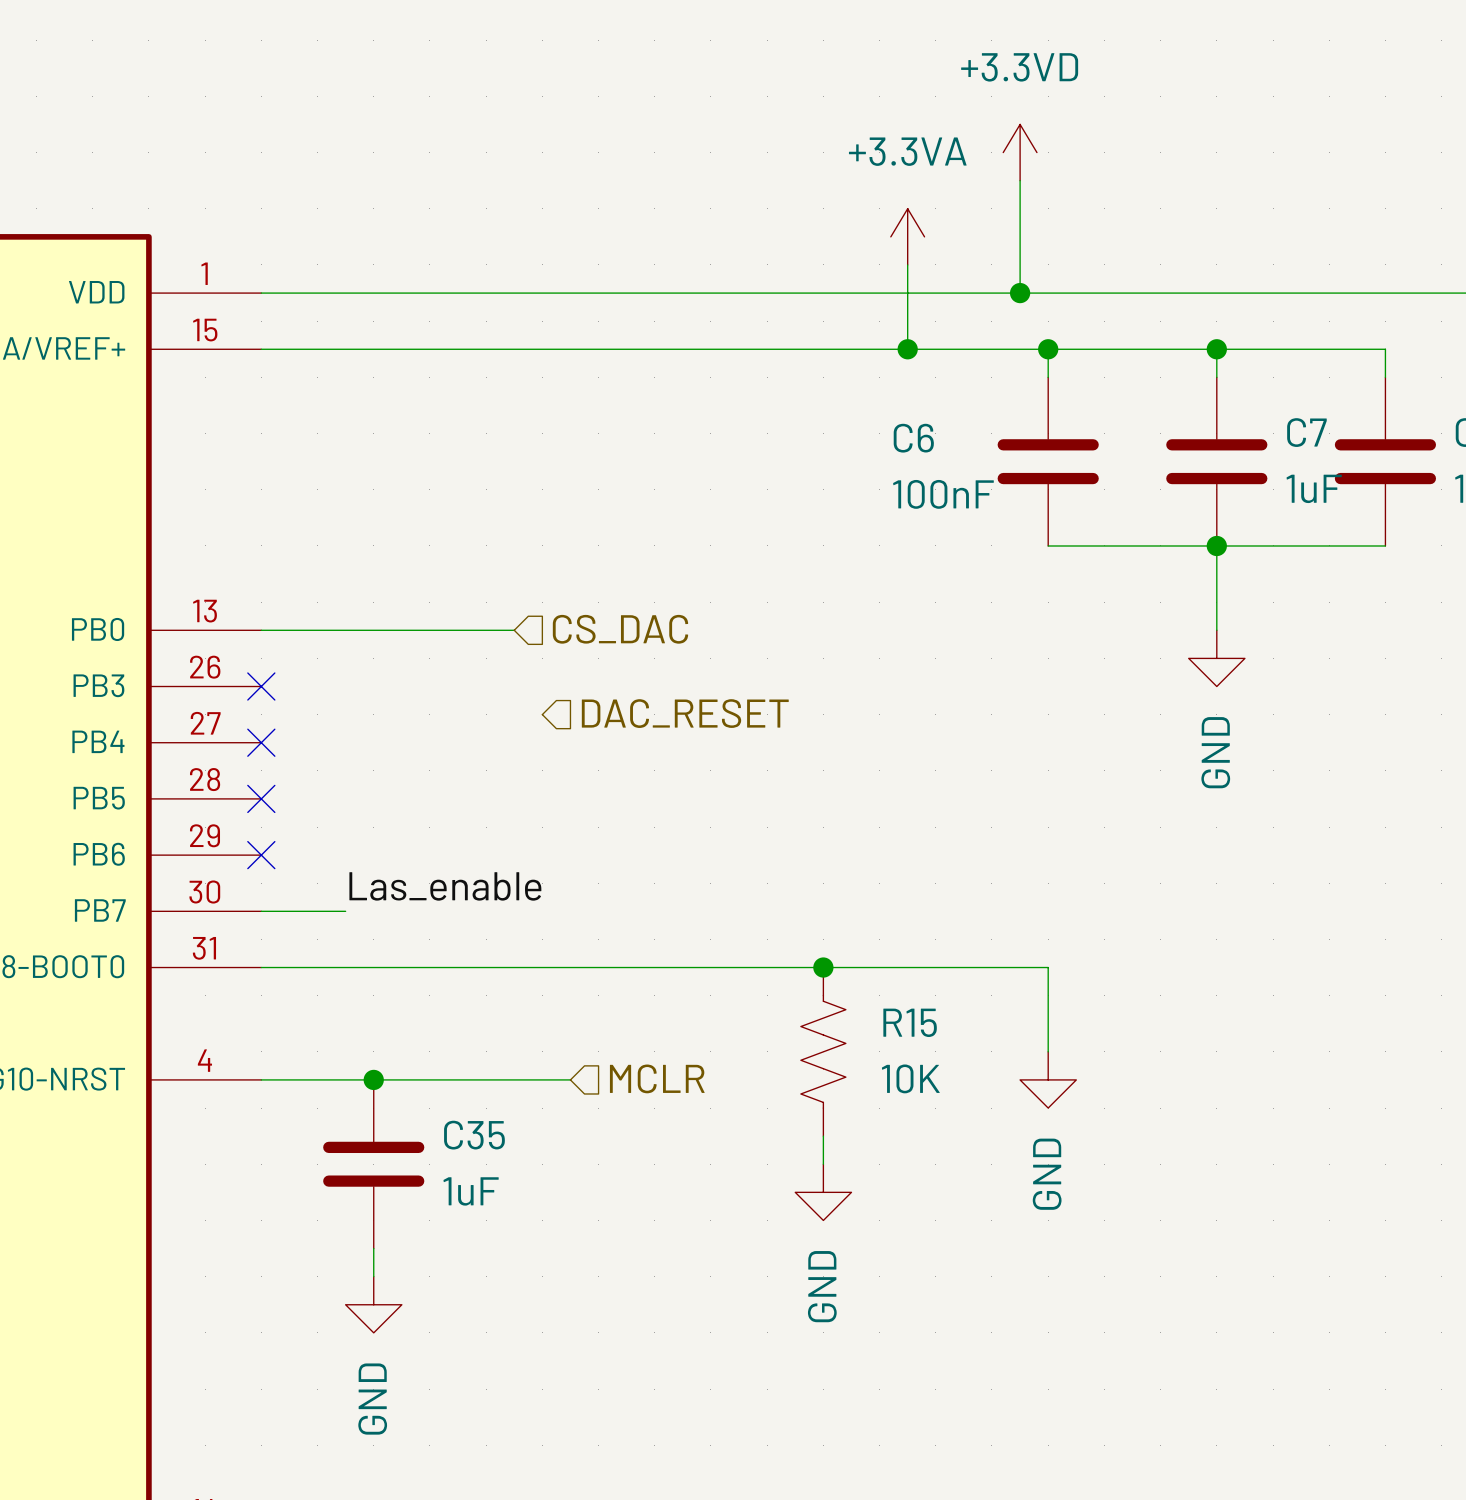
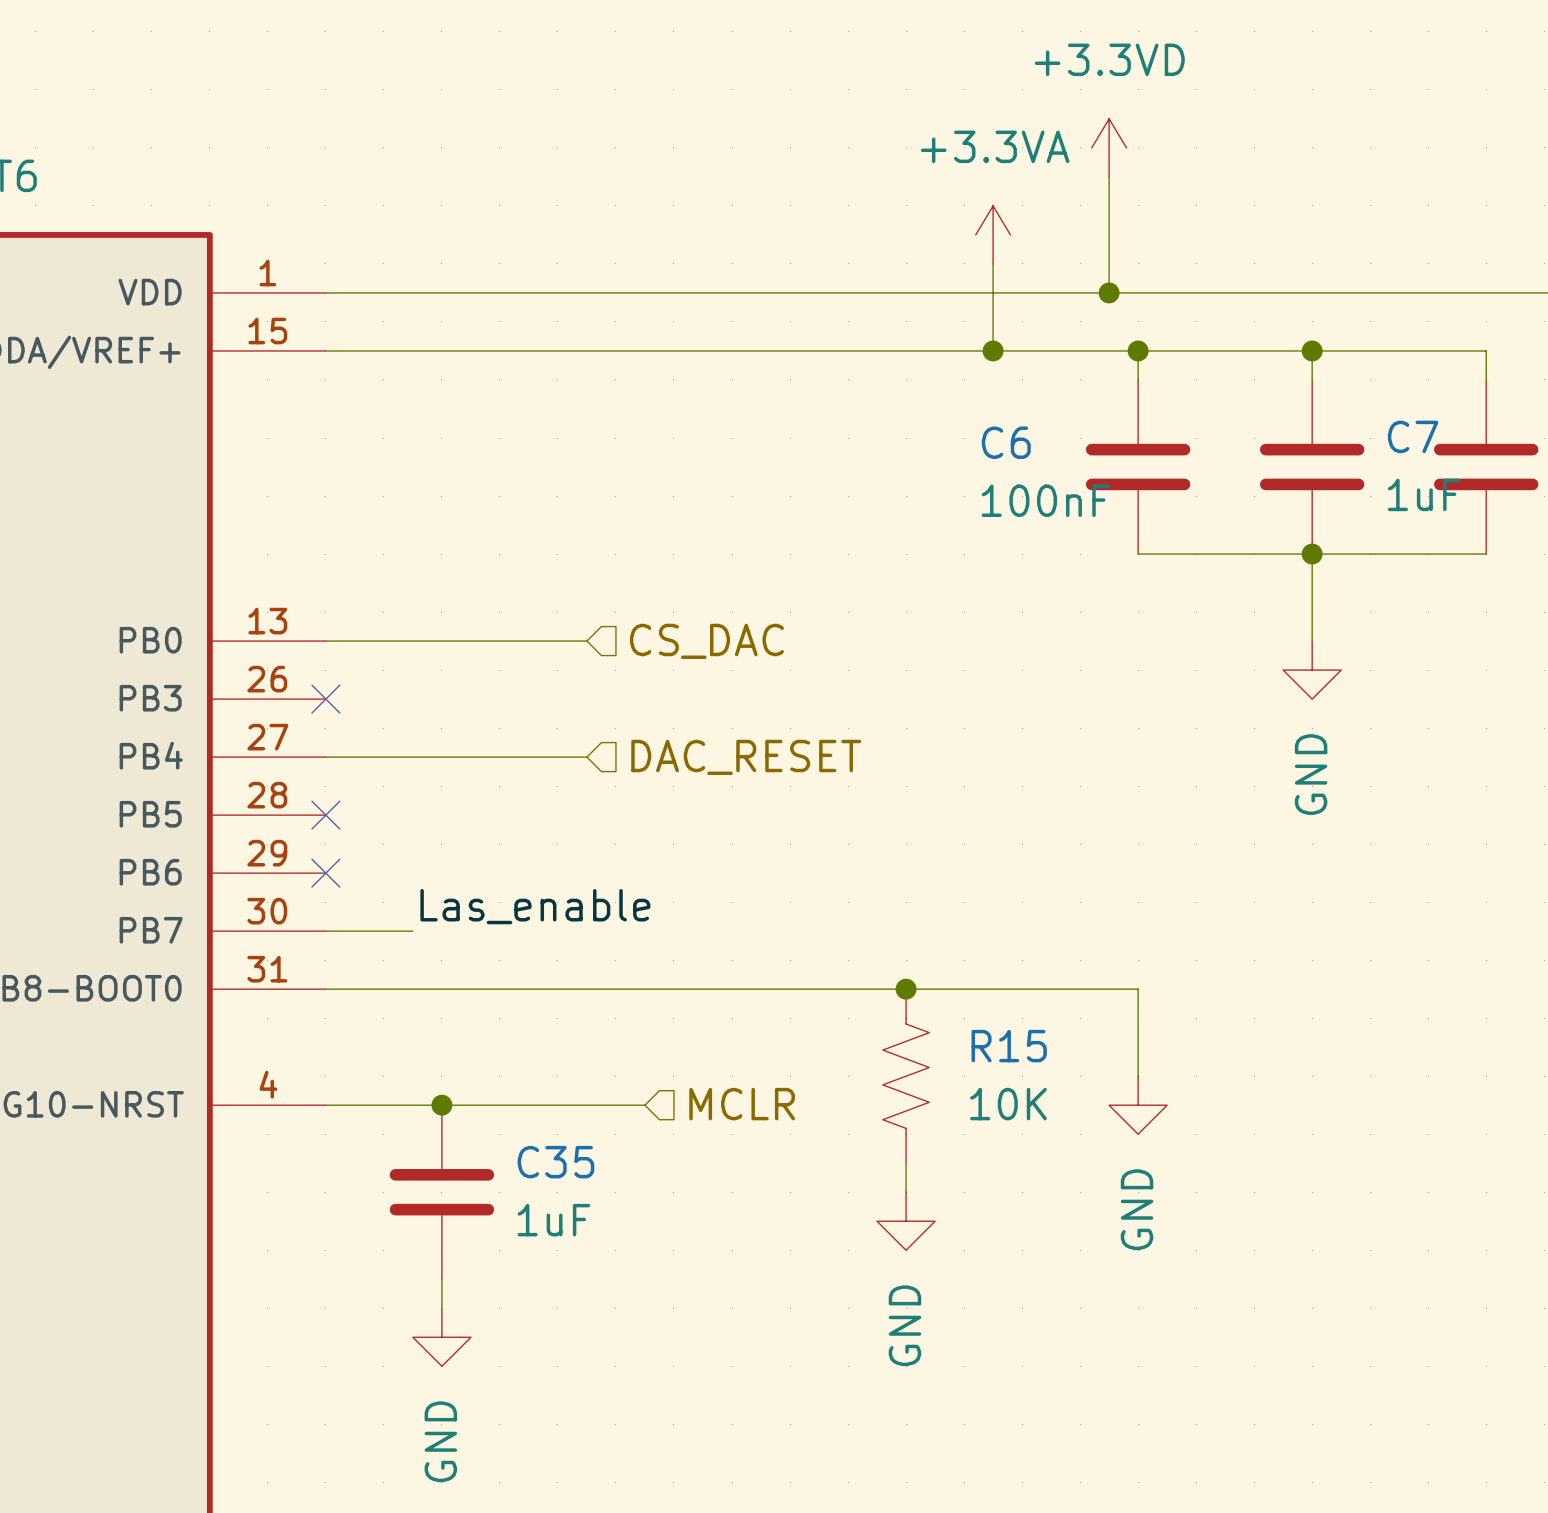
hierarchical label position: DAC_RESET (685, 713) -> DAC_RESET (746, 757)
wire: none -> (325, 757) (586, 757)
no-connect mark: (261, 742) -> none

